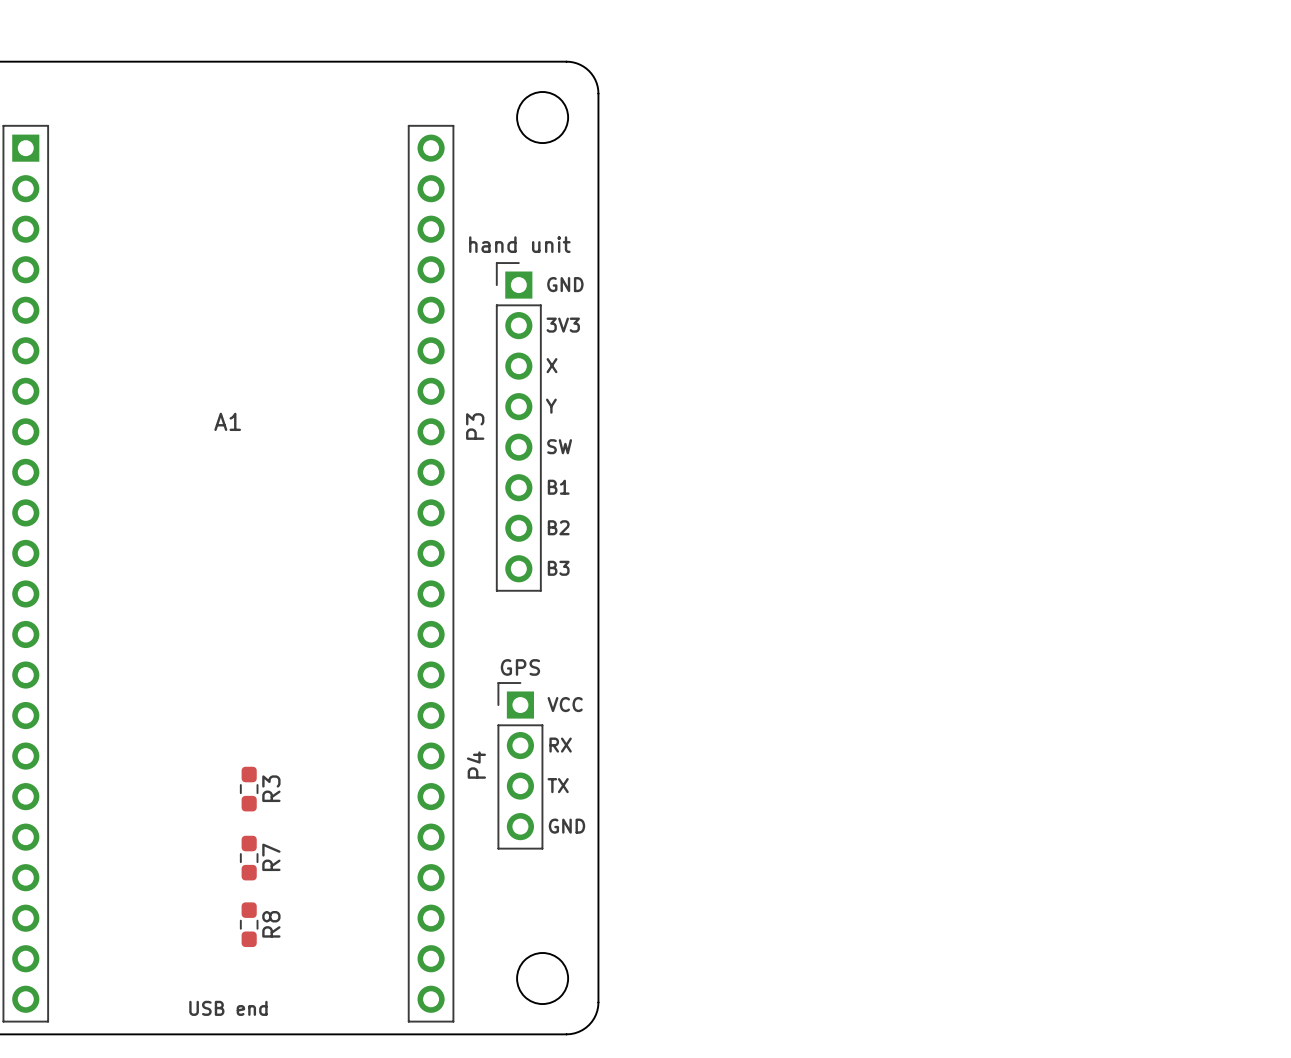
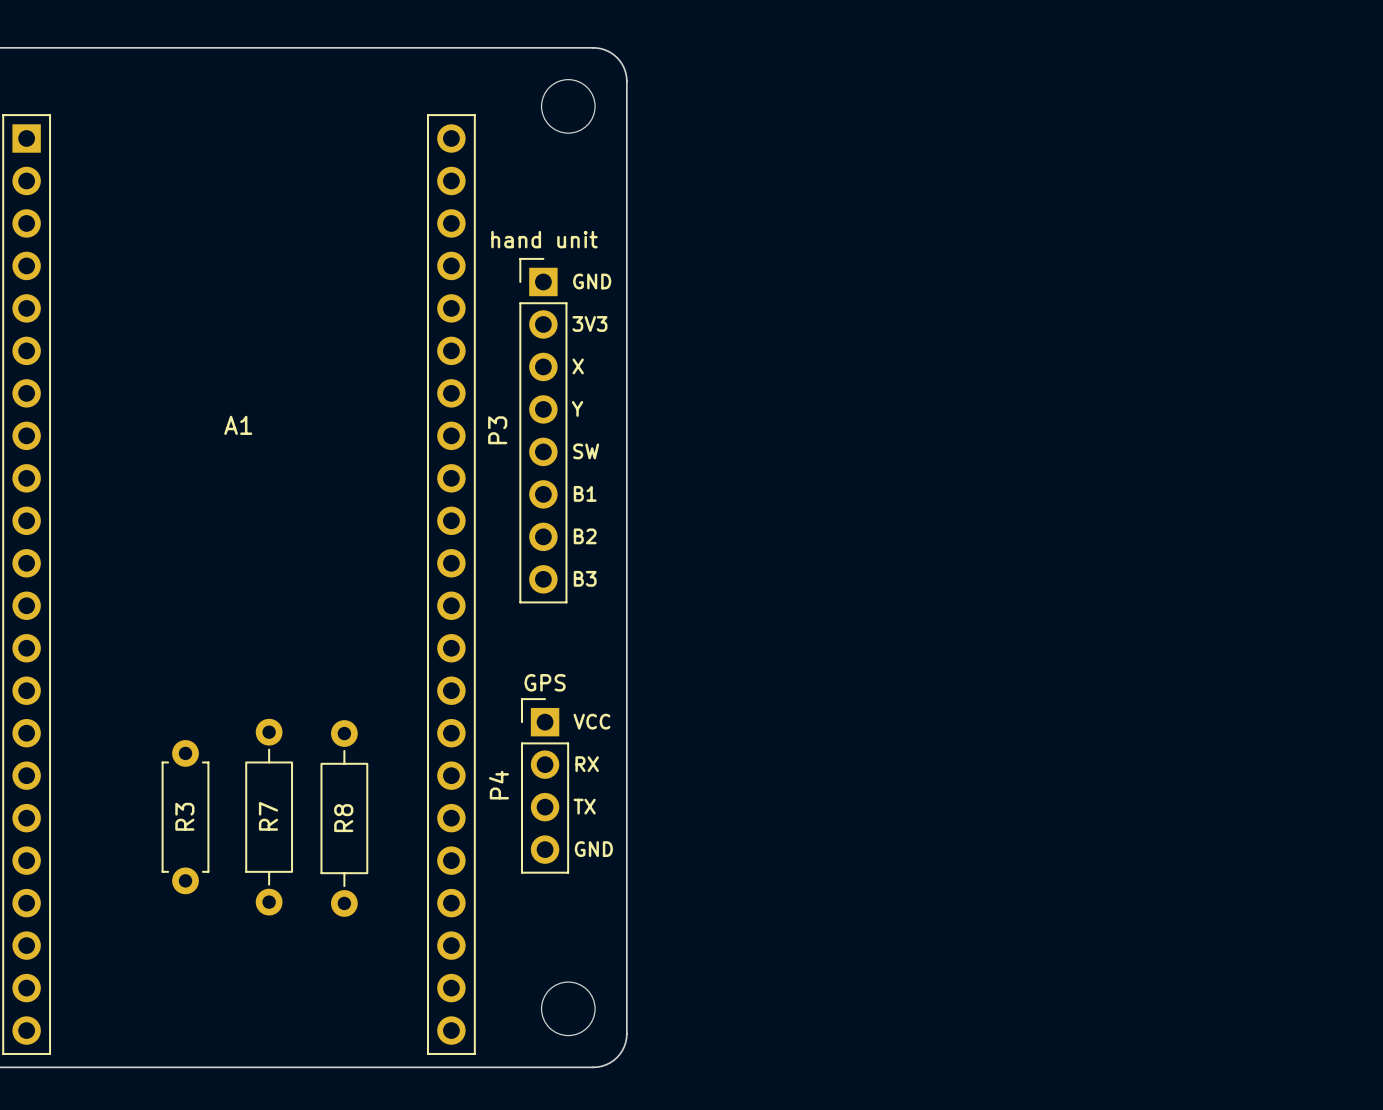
R3 footprint: [239, 766, 259, 812] -> [161, 740, 210, 895]
R7 footprint: [239, 835, 259, 881] -> [245, 718, 294, 916]
R8 footprint: [239, 902, 259, 948] -> [320, 720, 369, 917]
text: USB end (228, 1008) -> none

